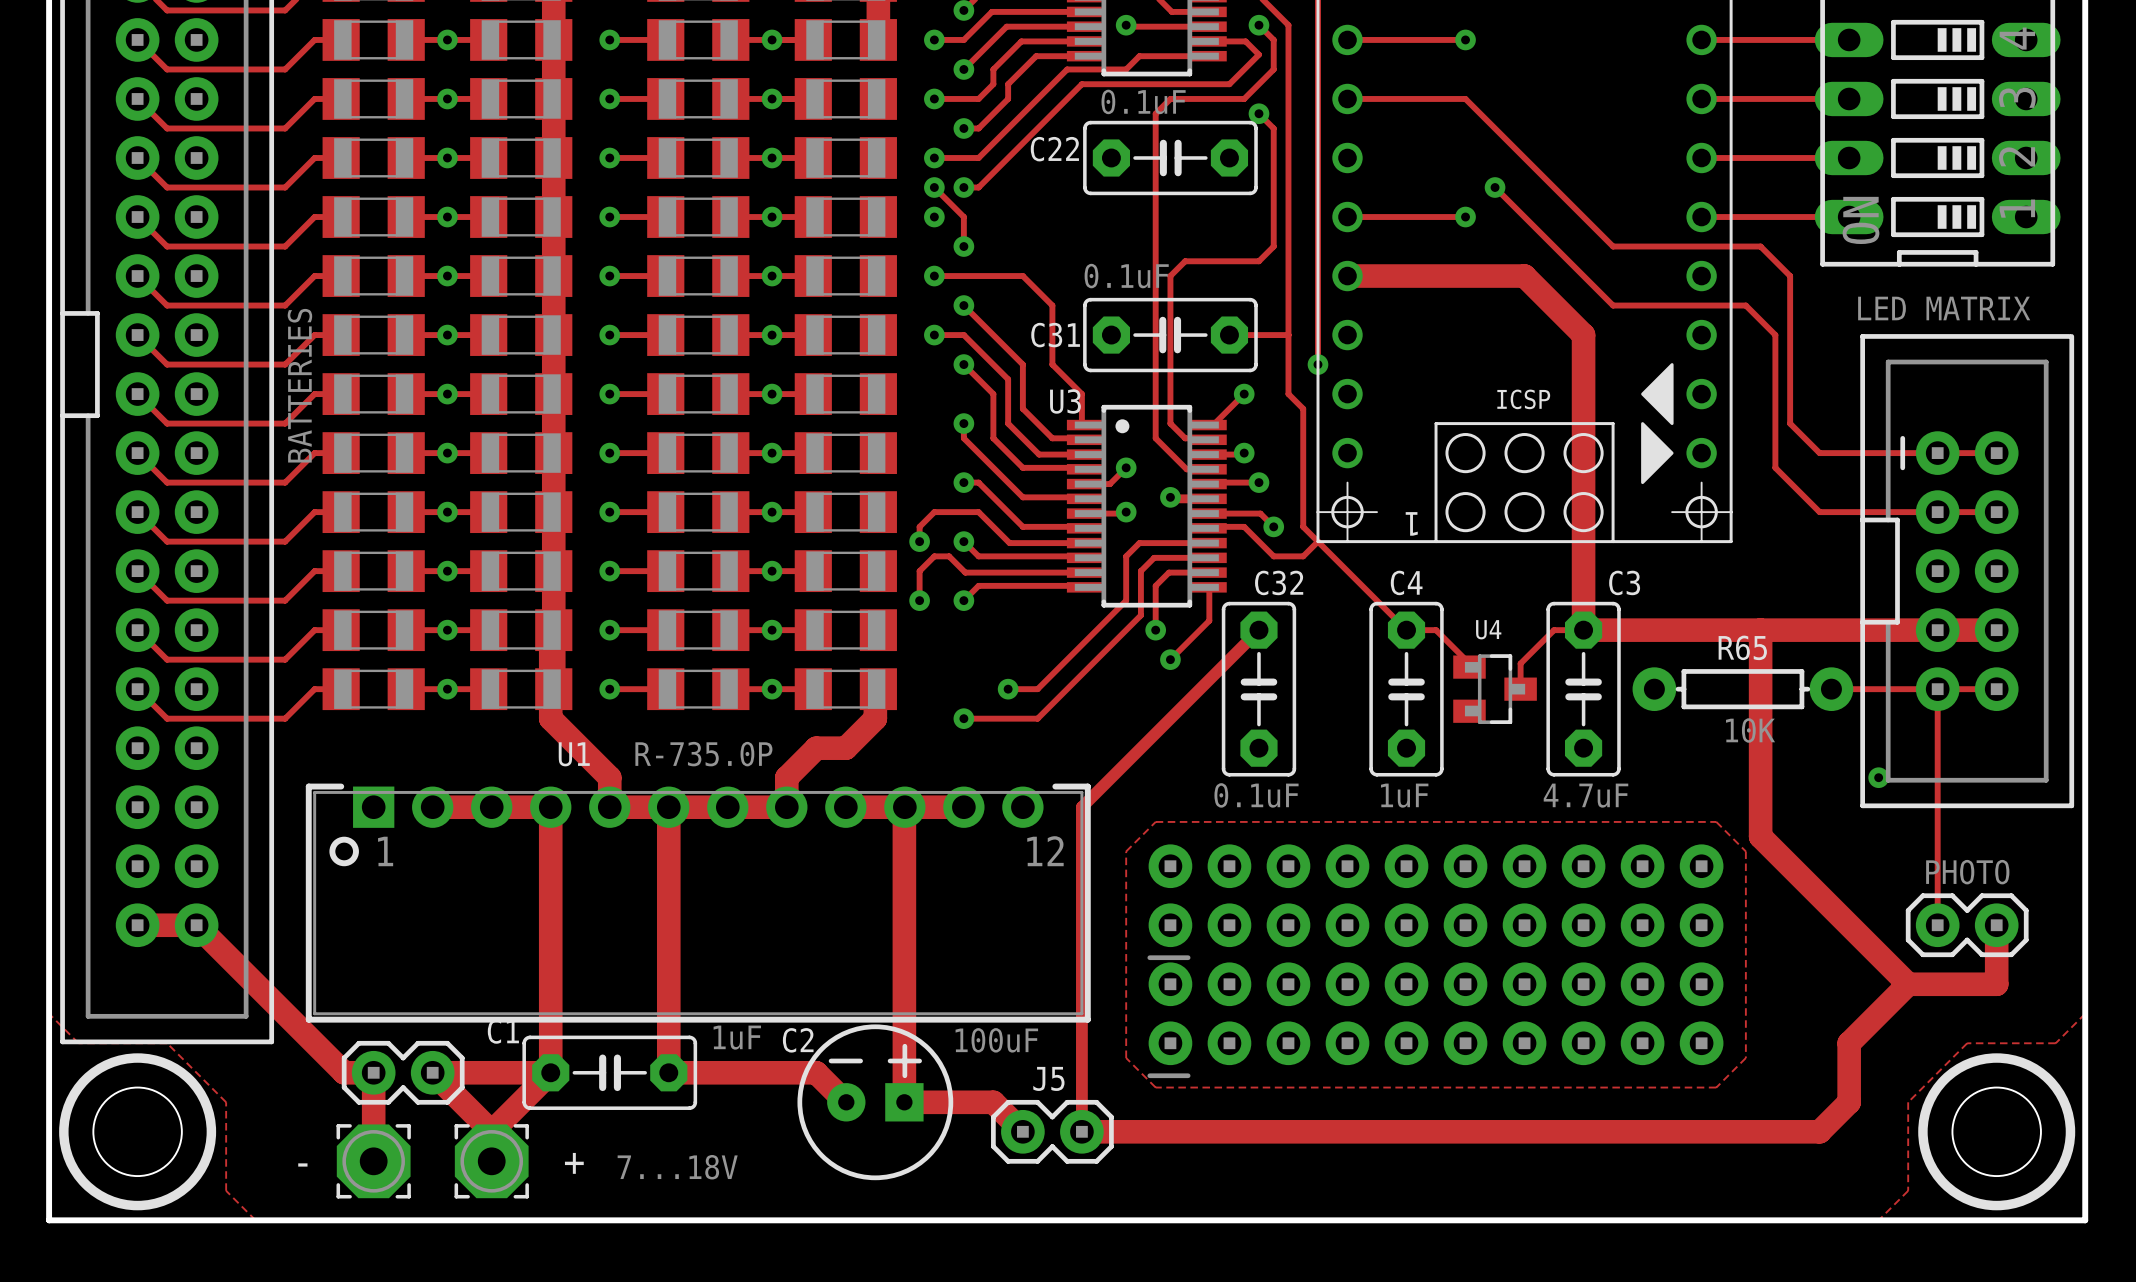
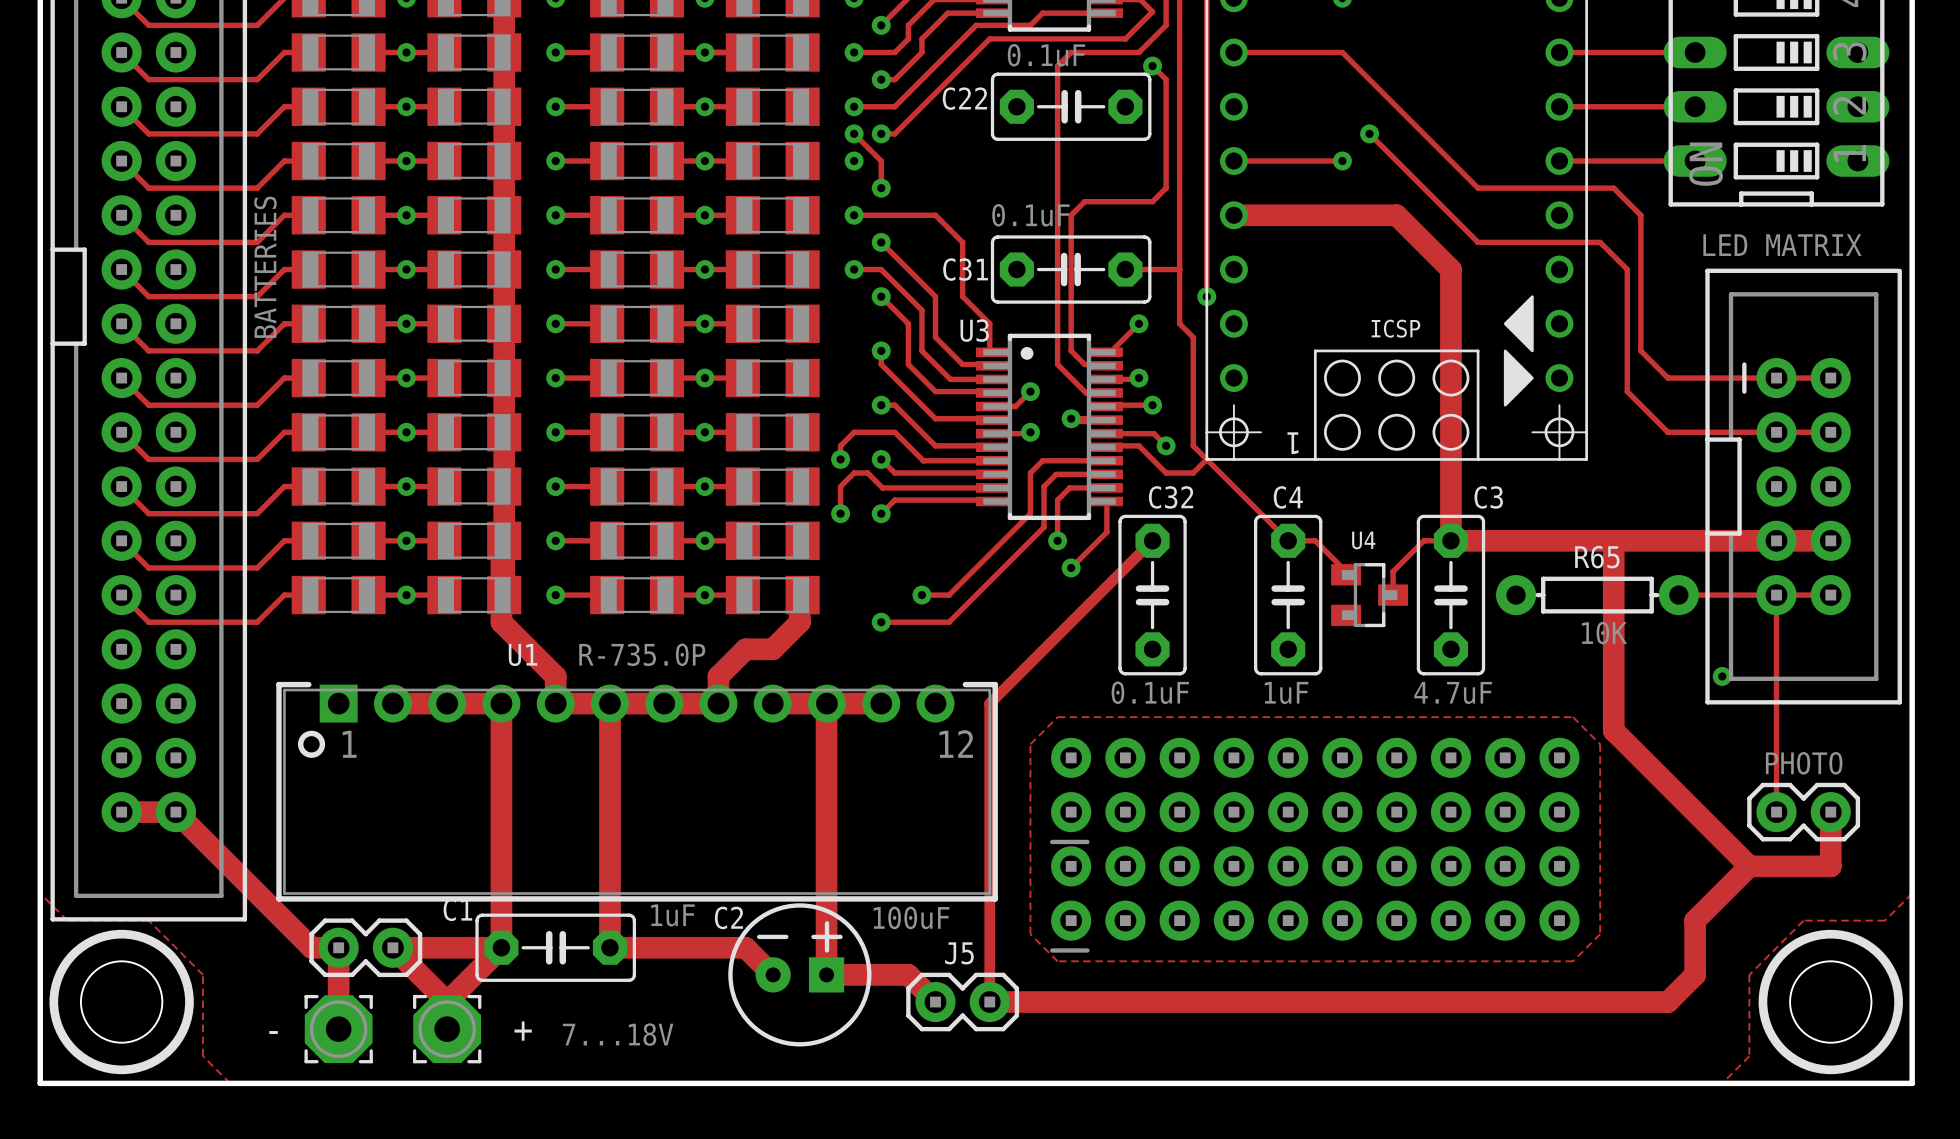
part value position: BATTERIES (299, 385) -> BATTERIES (265, 267)

